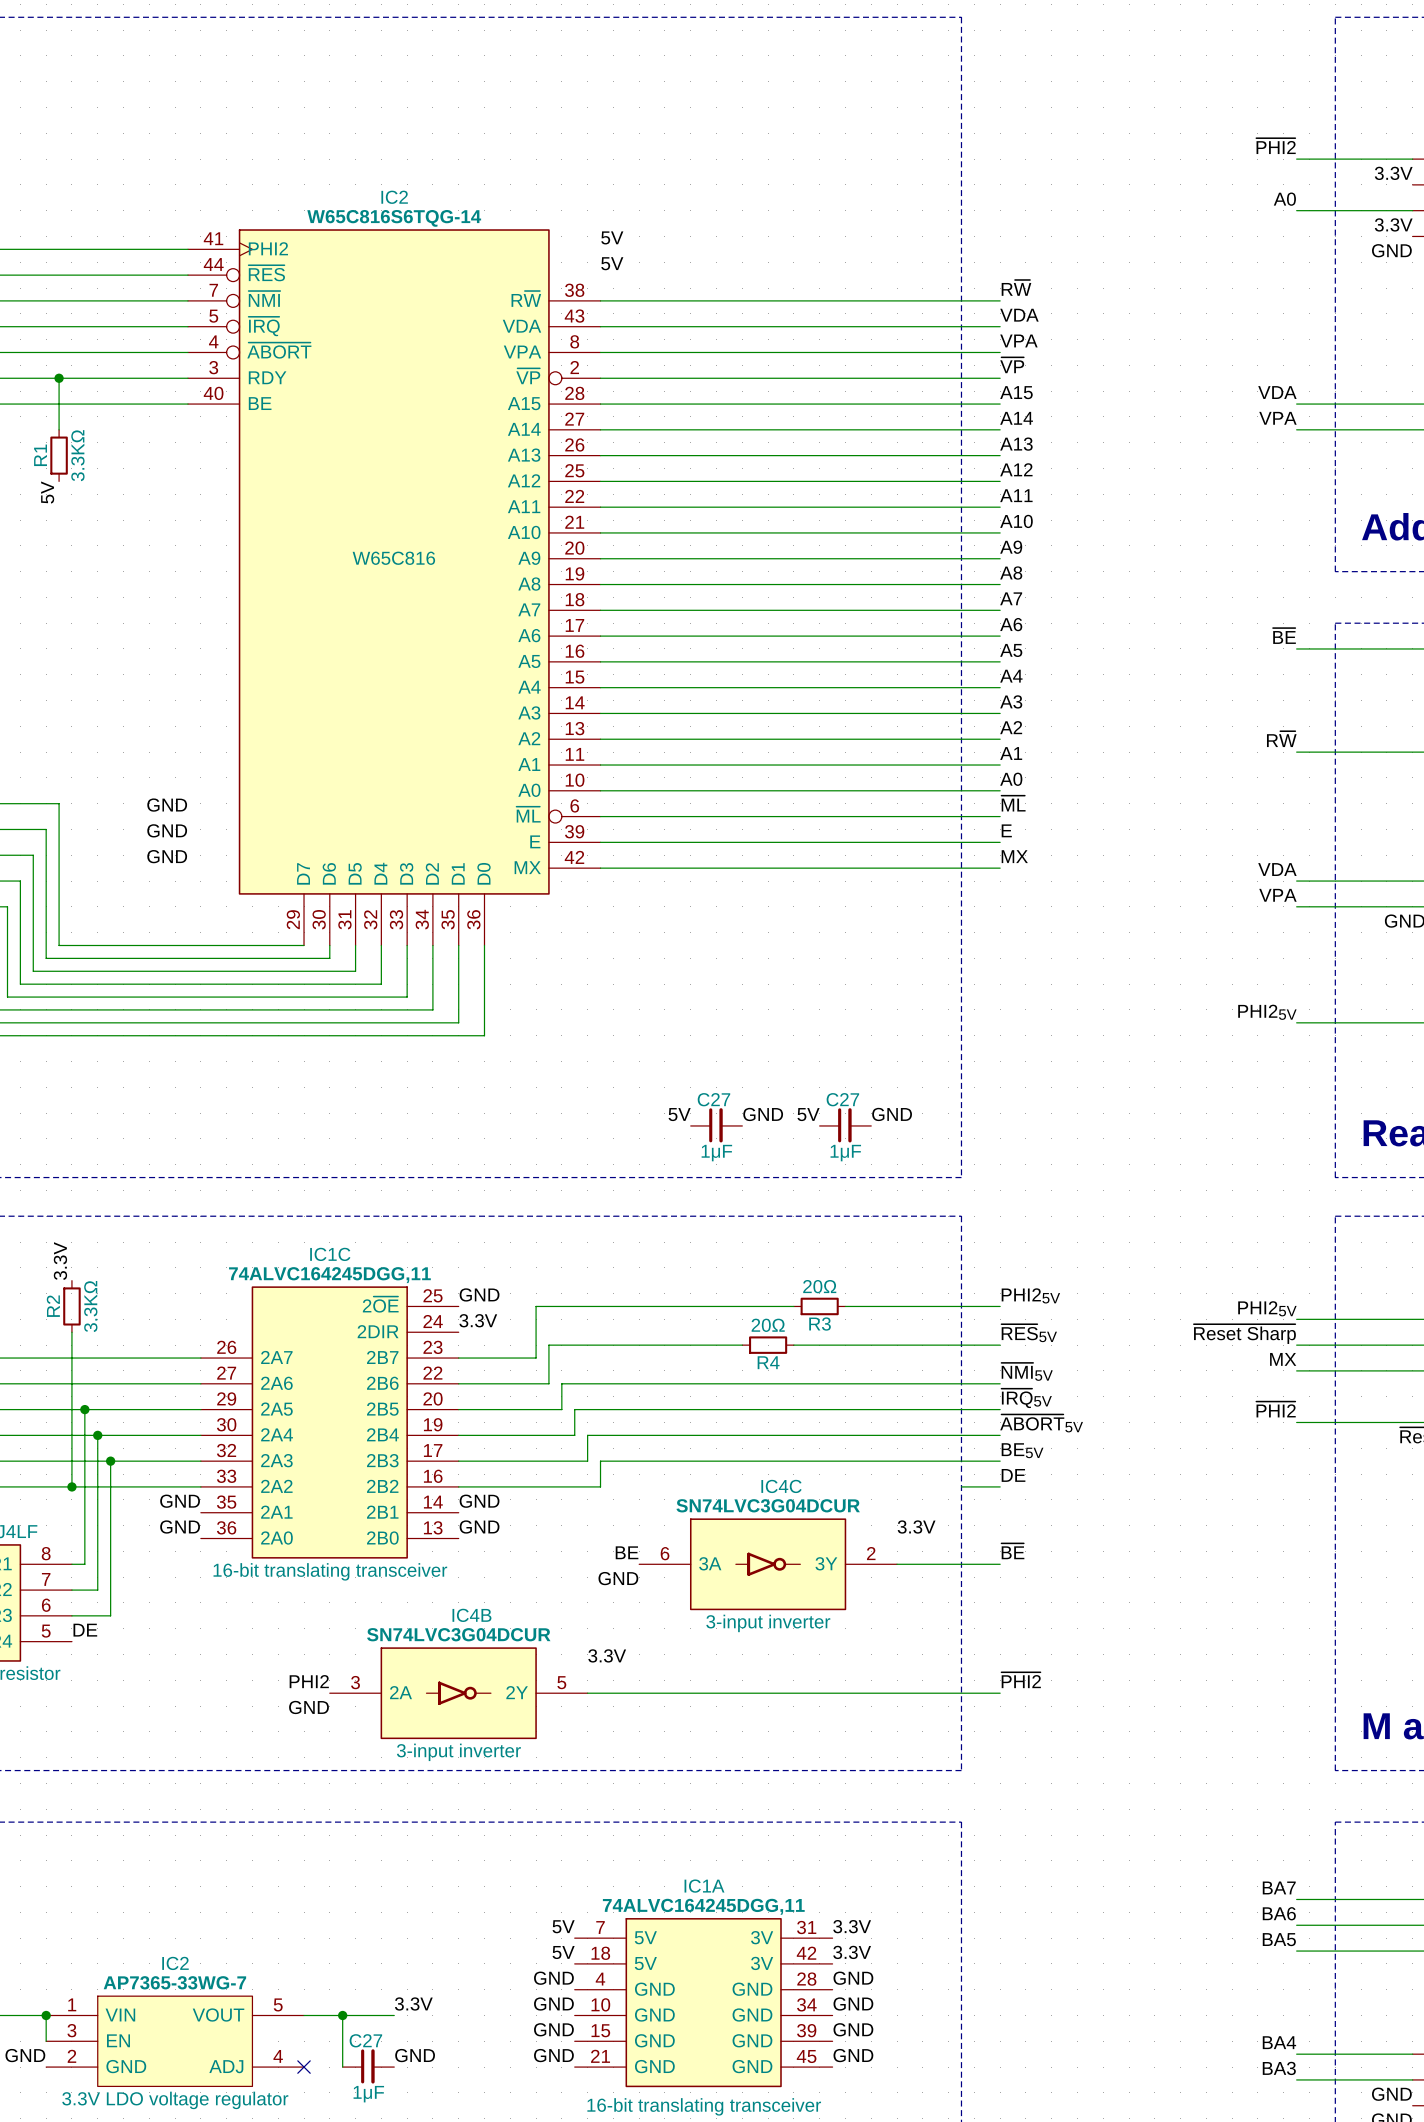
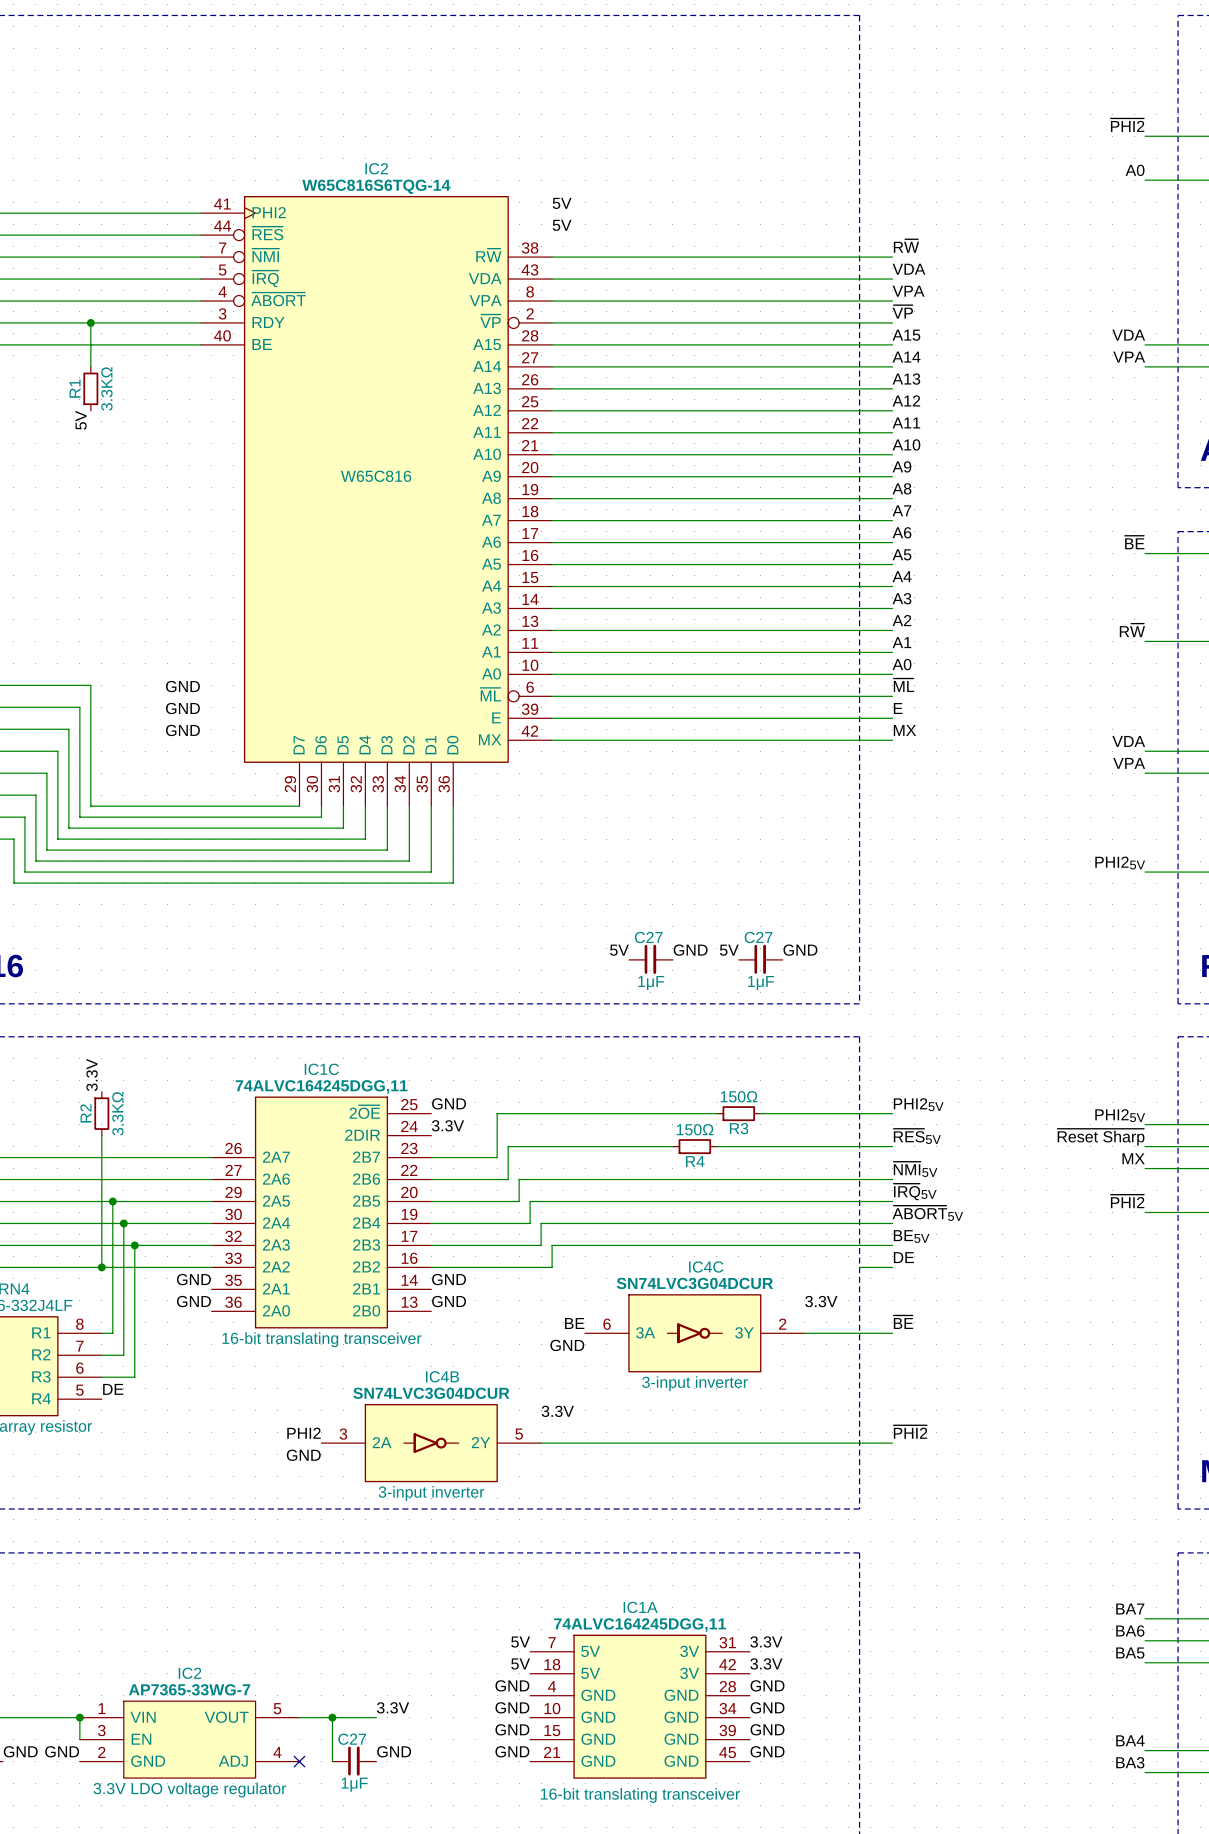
R3 value: 20Ω (819, 1286) -> 150Ω (739, 1096)
R4 value: 20Ω (768, 1325) -> 150Ω (695, 1129)

